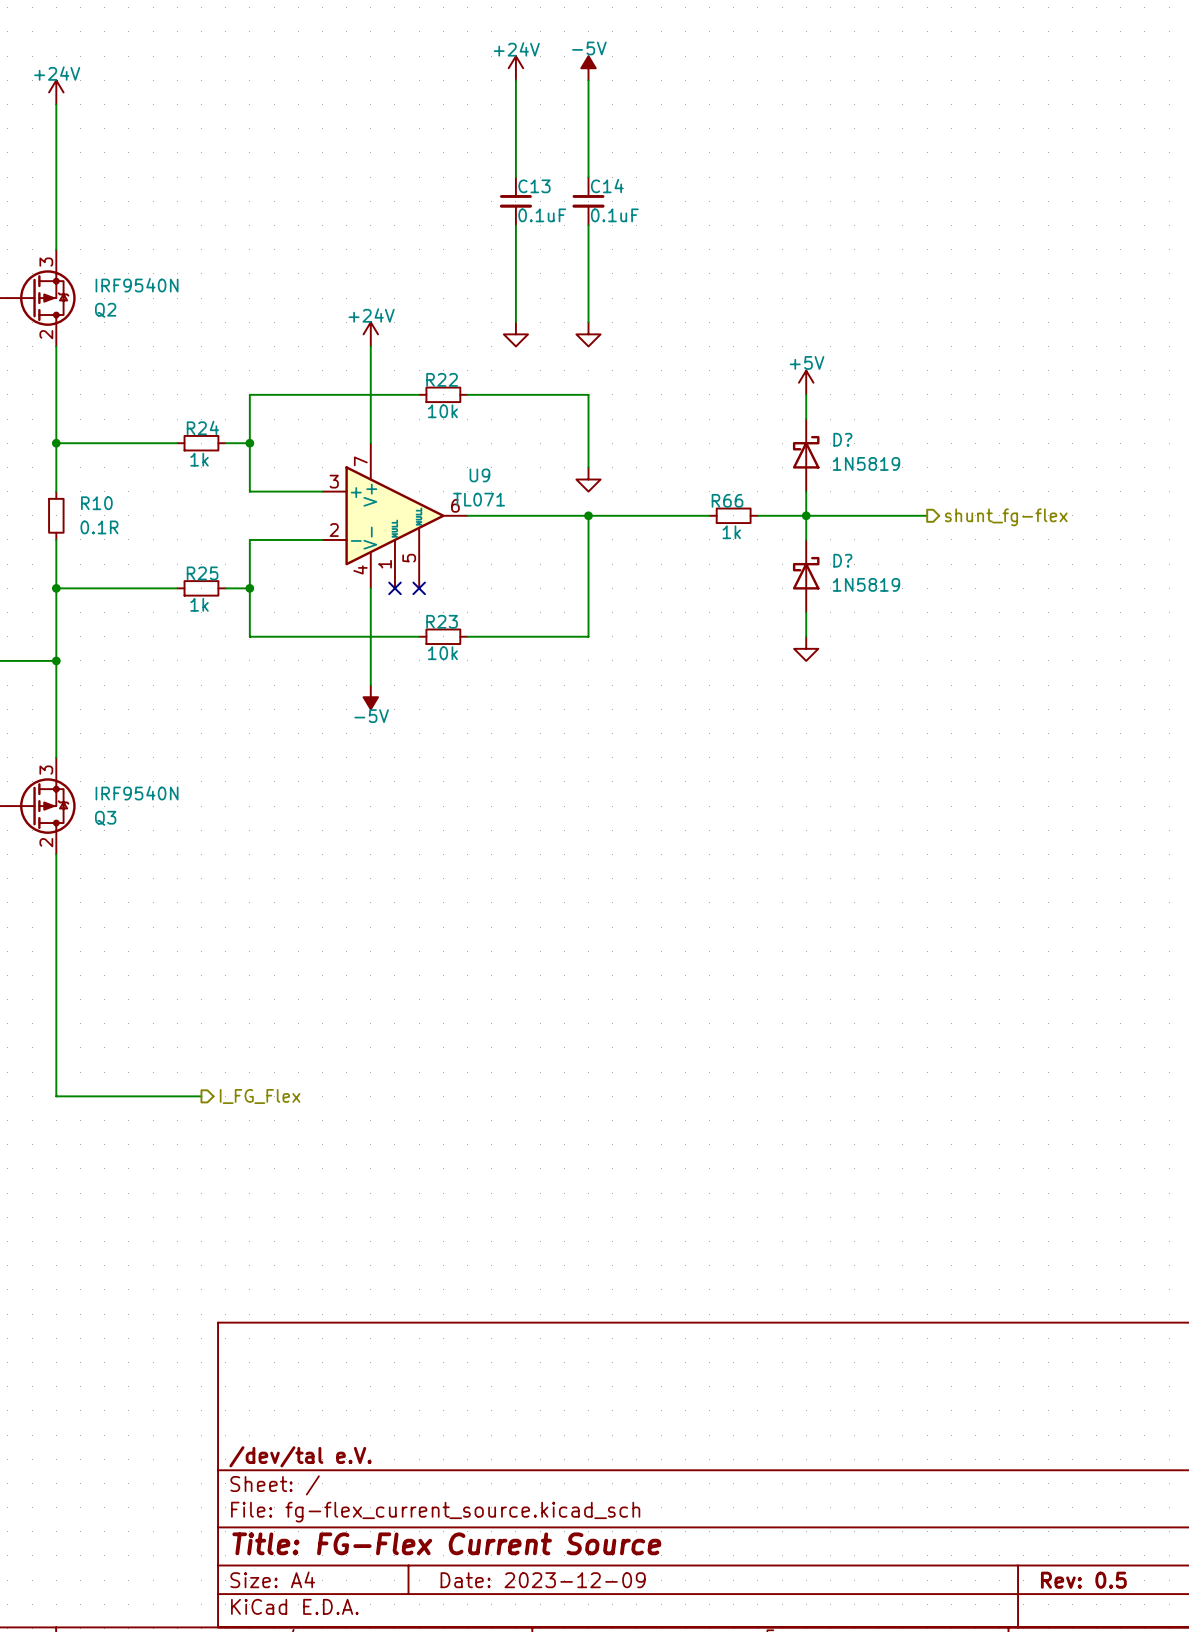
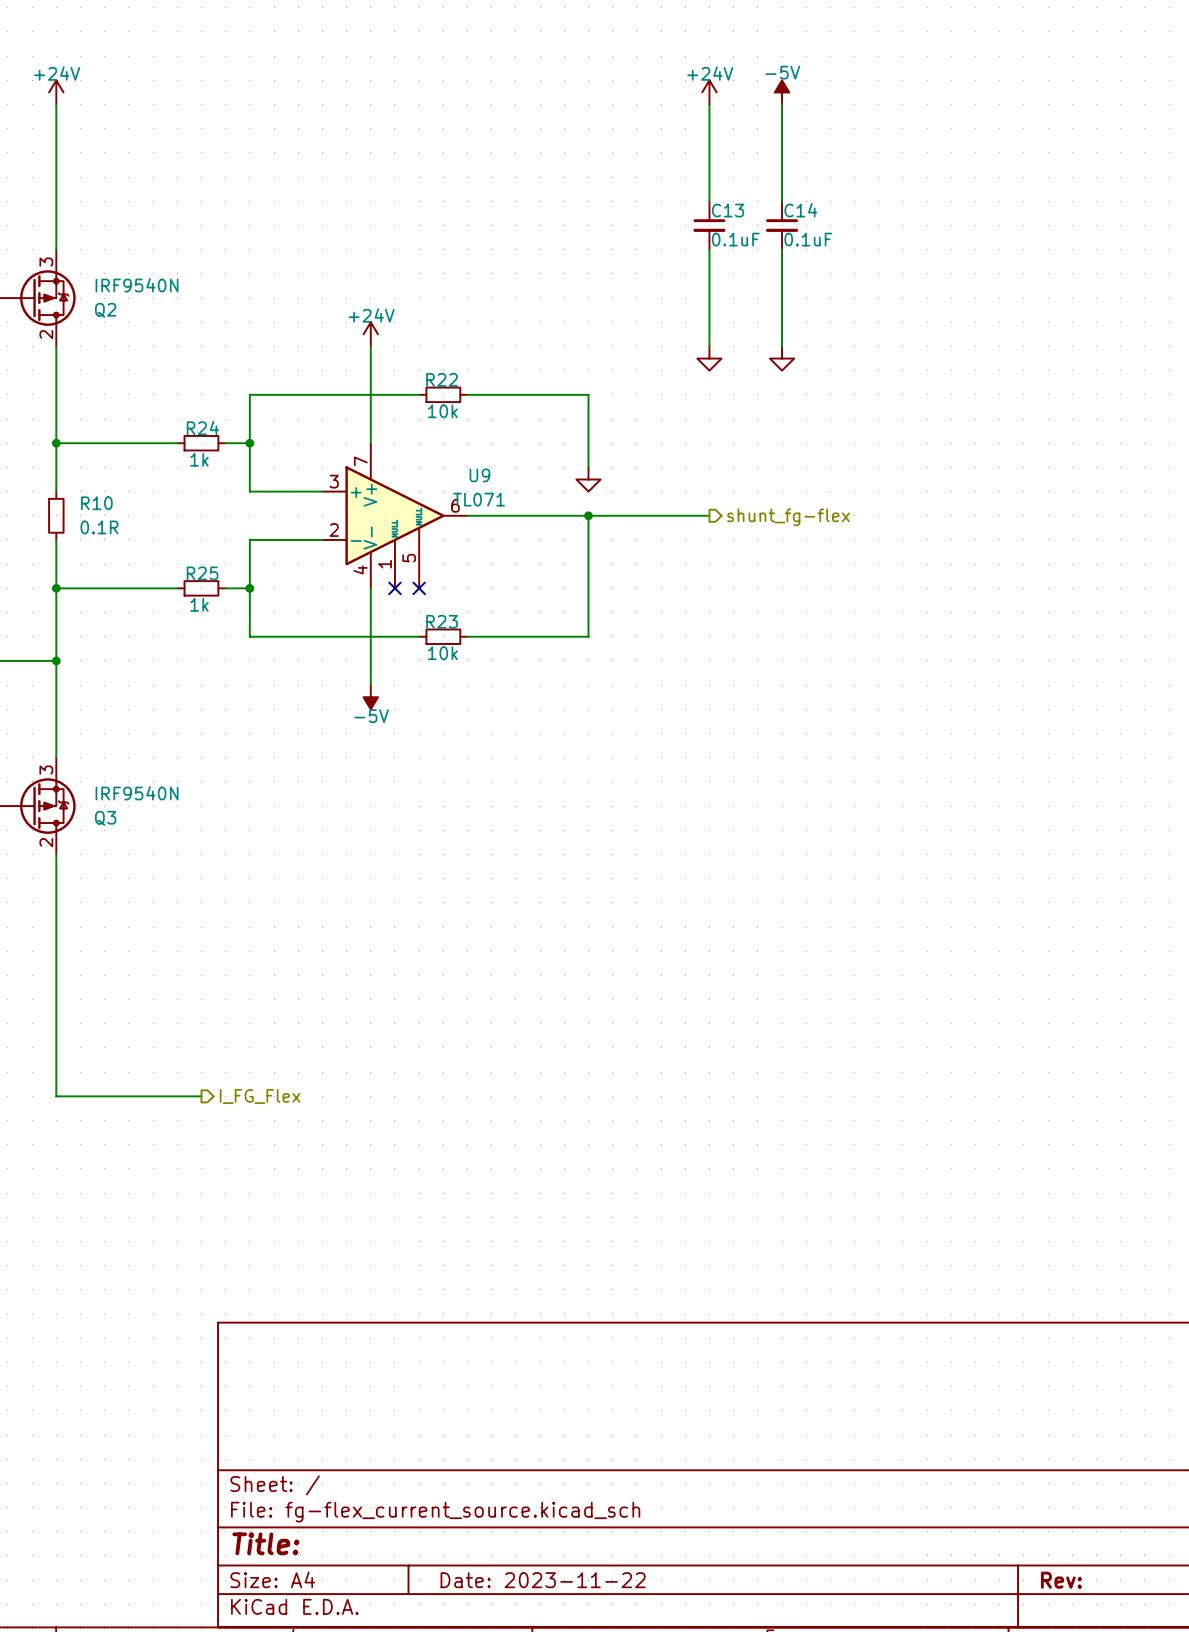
power symbol position: +24V (515, 68) -> +24V (709, 92)
power symbol position: -5V (588, 68) -> -5V (782, 92)
wire: (515, 80) (515, 177) -> (709, 104) (709, 201)
wire: (588, 80) (588, 177) -> (782, 104) (782, 201)
C13 position: (515, 201) -> (709, 225)
C14 position: (588, 201) -> (782, 225)
wire: (515, 225) (515, 322) -> (709, 249) (709, 346)
wire: (588, 225) (588, 322) -> (782, 249) (782, 346)
power symbol: (515, 334) -> none
power symbol: (588, 334) -> none
power symbol: none -> (709, 358)
power symbol: none -> (782, 358)
power symbol: +5V (806, 382) -> none
wire: (806, 394) (806, 419) -> none
D?: 1N5819 (806, 455) -> none
wire: (806, 491) (806, 539) -> none
R66: 1k (733, 515) -> none
wire: (757, 515) (927, 515) -> none
junction: (806, 515) -> none
hierarchical label position: shunt_fg-flex (1006, 517) -> shunt_fg-flex (788, 517)
D?: 1N5819 (806, 576) -> none
wire: (806, 612) (806, 636) -> none
power symbol: (806, 648) -> none
title block: /dev/tal e.V. (300, 1456) -> none
title block: Title: FG-Flex Current Source (446, 1543) -> Title: (265, 1543)
title block: Date: 2023-12-09 (543, 1580) -> Date: 2023-11-22 (543, 1580)
title block: Rev: 0.5 (1083, 1580) -> Rev: (1061, 1580)

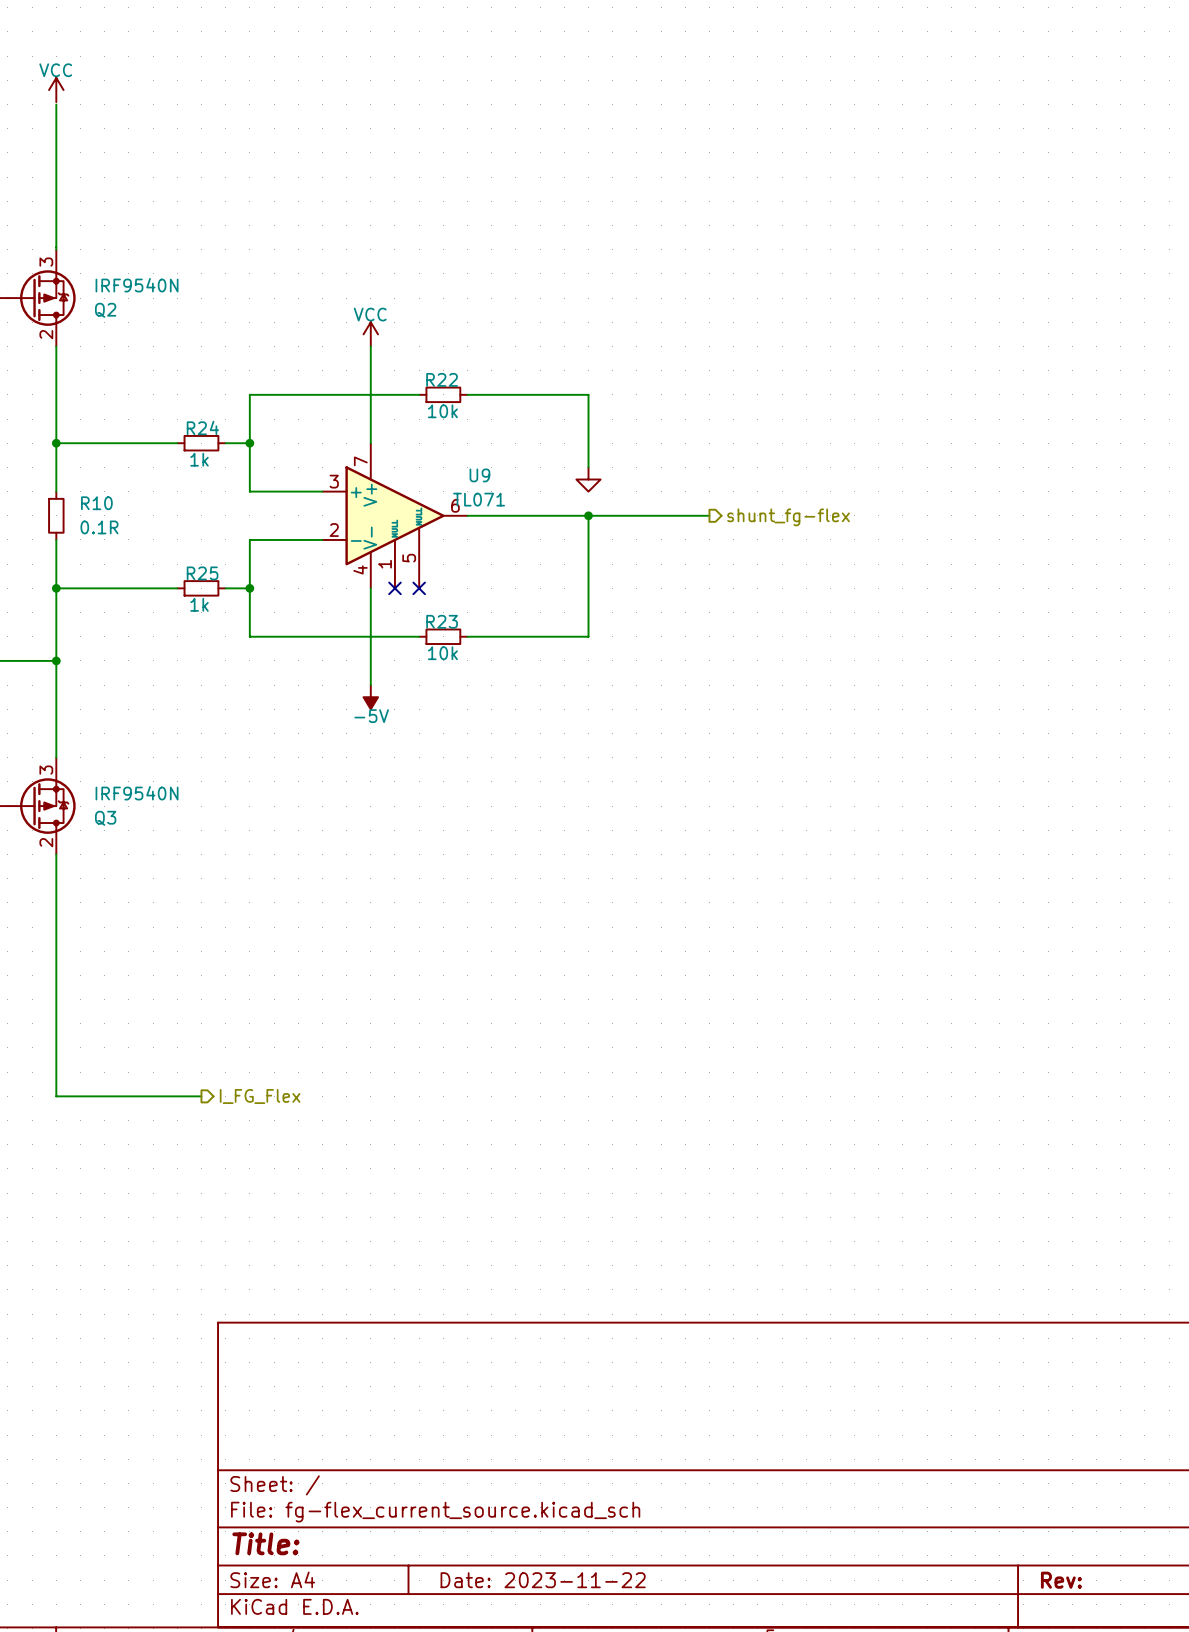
power symbol: +24V (56, 92) -> VCC (56, 90)
power symbol: +24V (709, 92) -> none
power symbol: -5V (782, 92) -> none
wire: (709, 104) (709, 201) -> none
wire: (782, 104) (782, 201) -> none
C13: 0.1uF (709, 225) -> none
C14: 0.1uF (782, 225) -> none
wire: (709, 249) (709, 346) -> none
wire: (782, 249) (782, 346) -> none
power symbol: +24V (370, 334) -> VCC (370, 334)
power symbol: (709, 358) -> none
power symbol: (782, 358) -> none

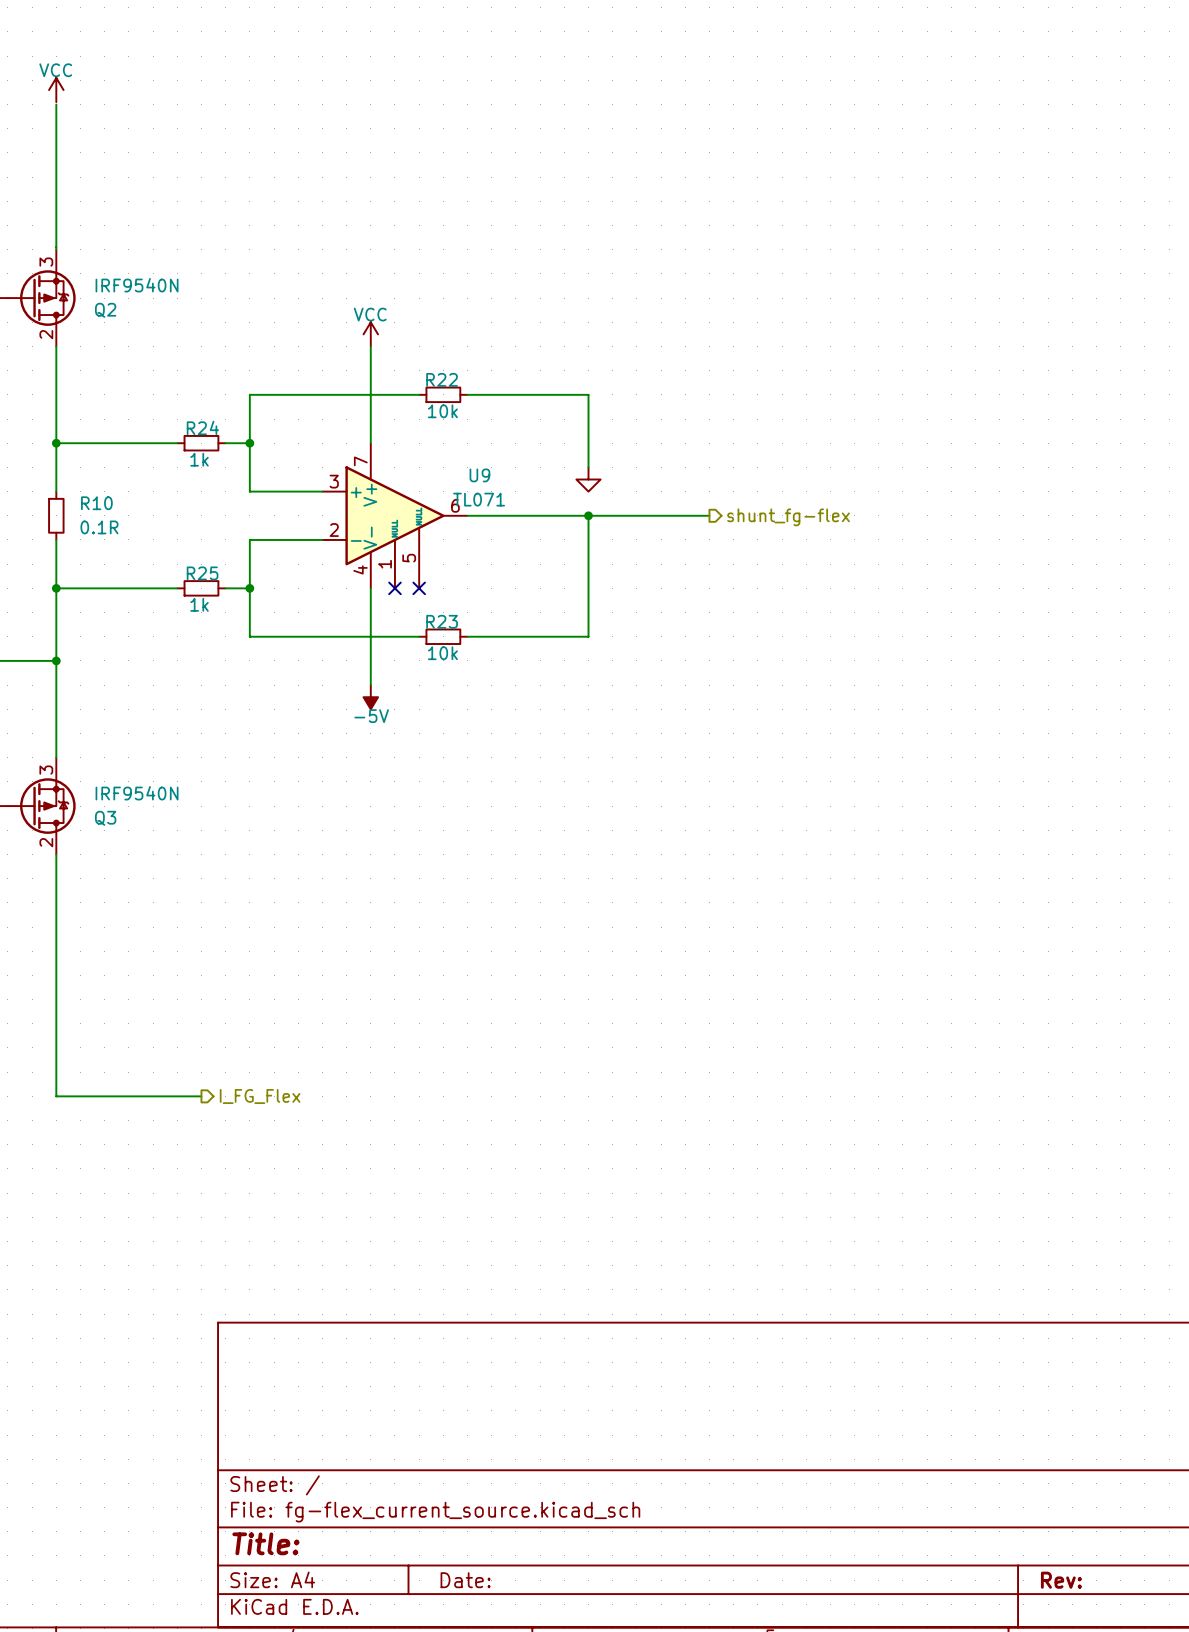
title block: Date: 2023-11-22 (543, 1580) -> Date: (465, 1580)

